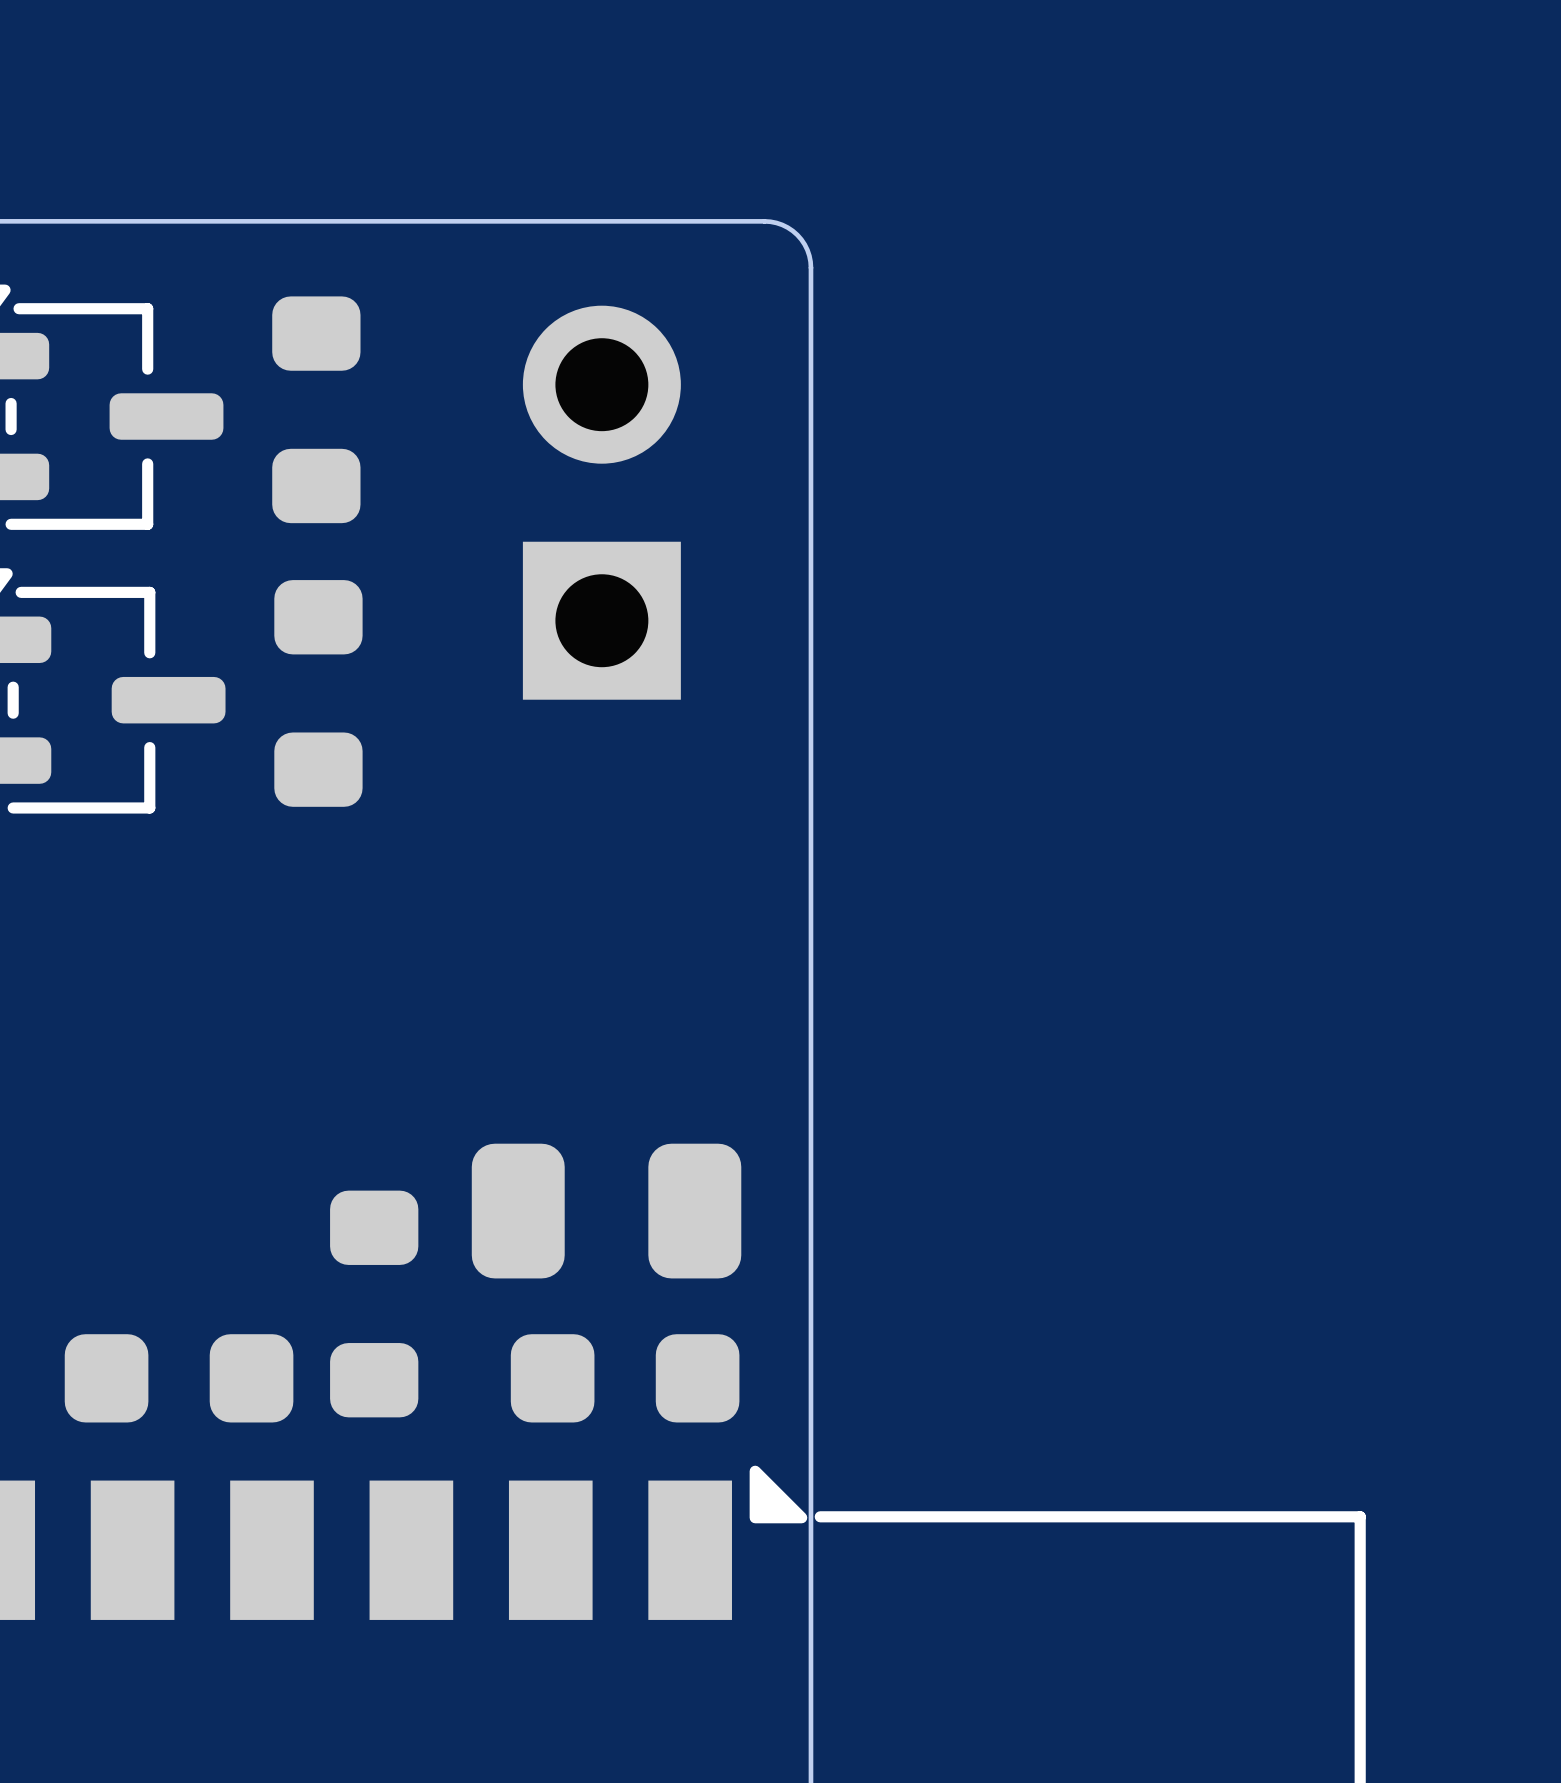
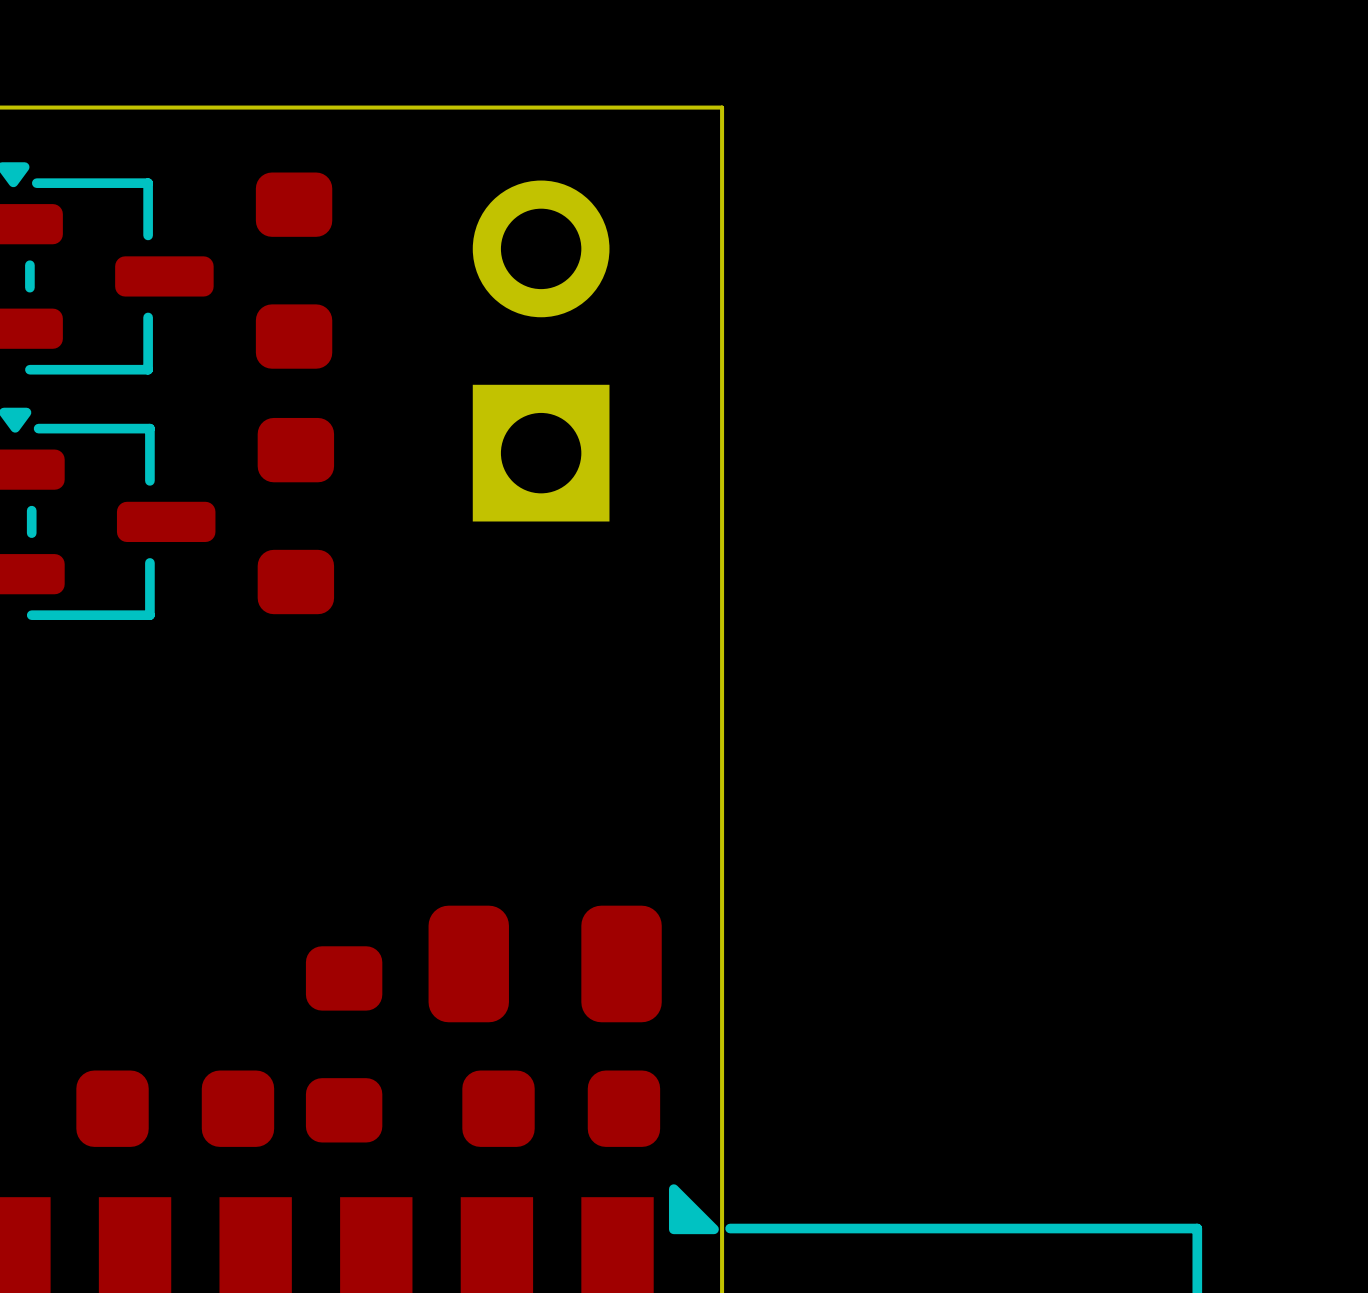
board edge: (764, 221) (782, 224) (797, 234) (807, 250) (810, 267) -> (681, 107) (722, 107) (722, 147)

